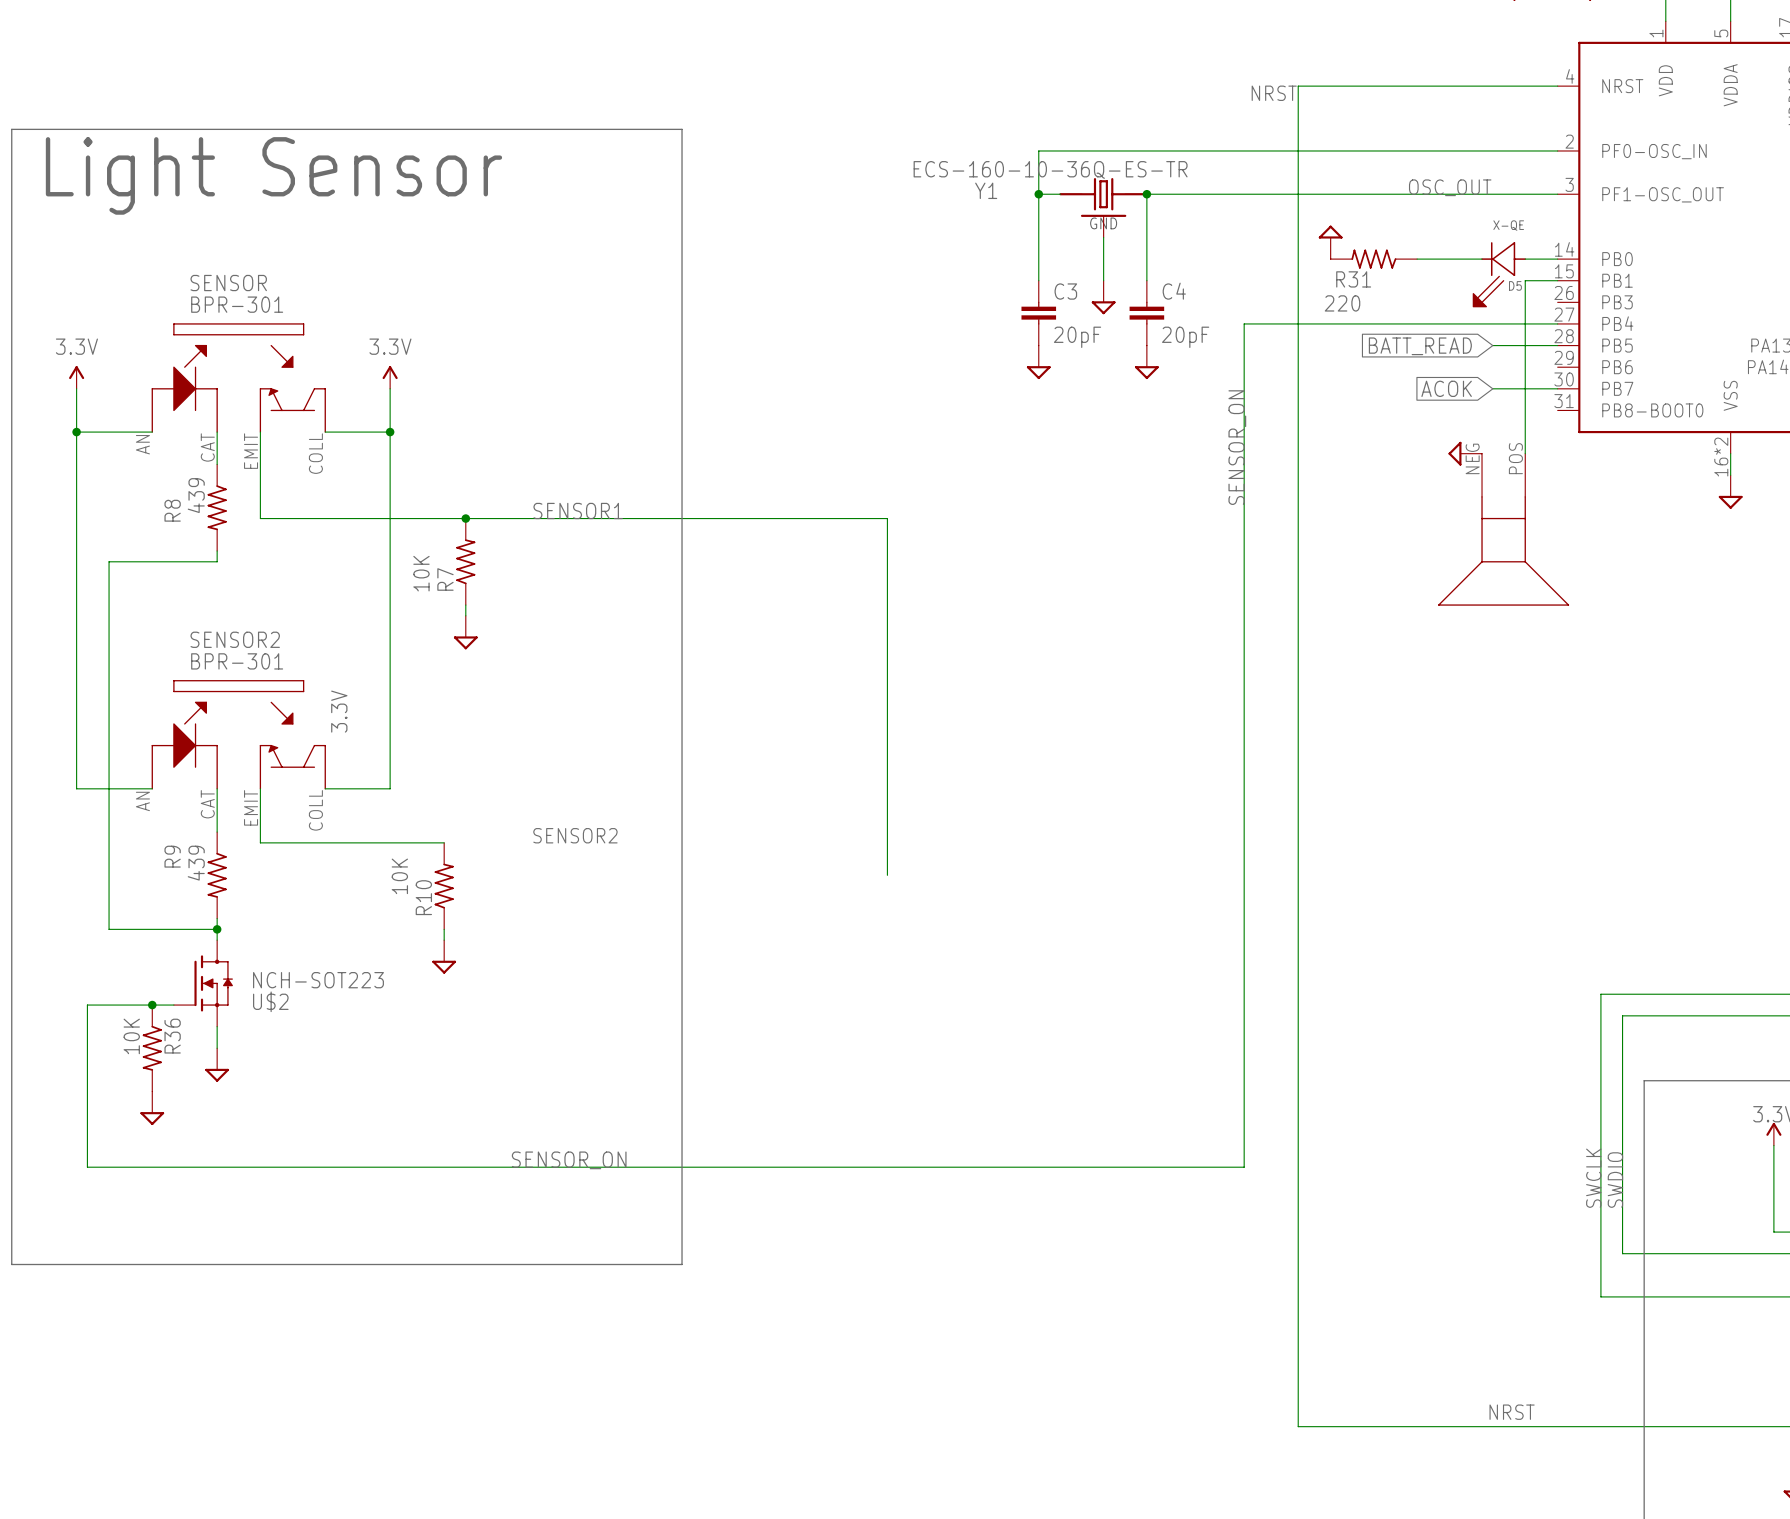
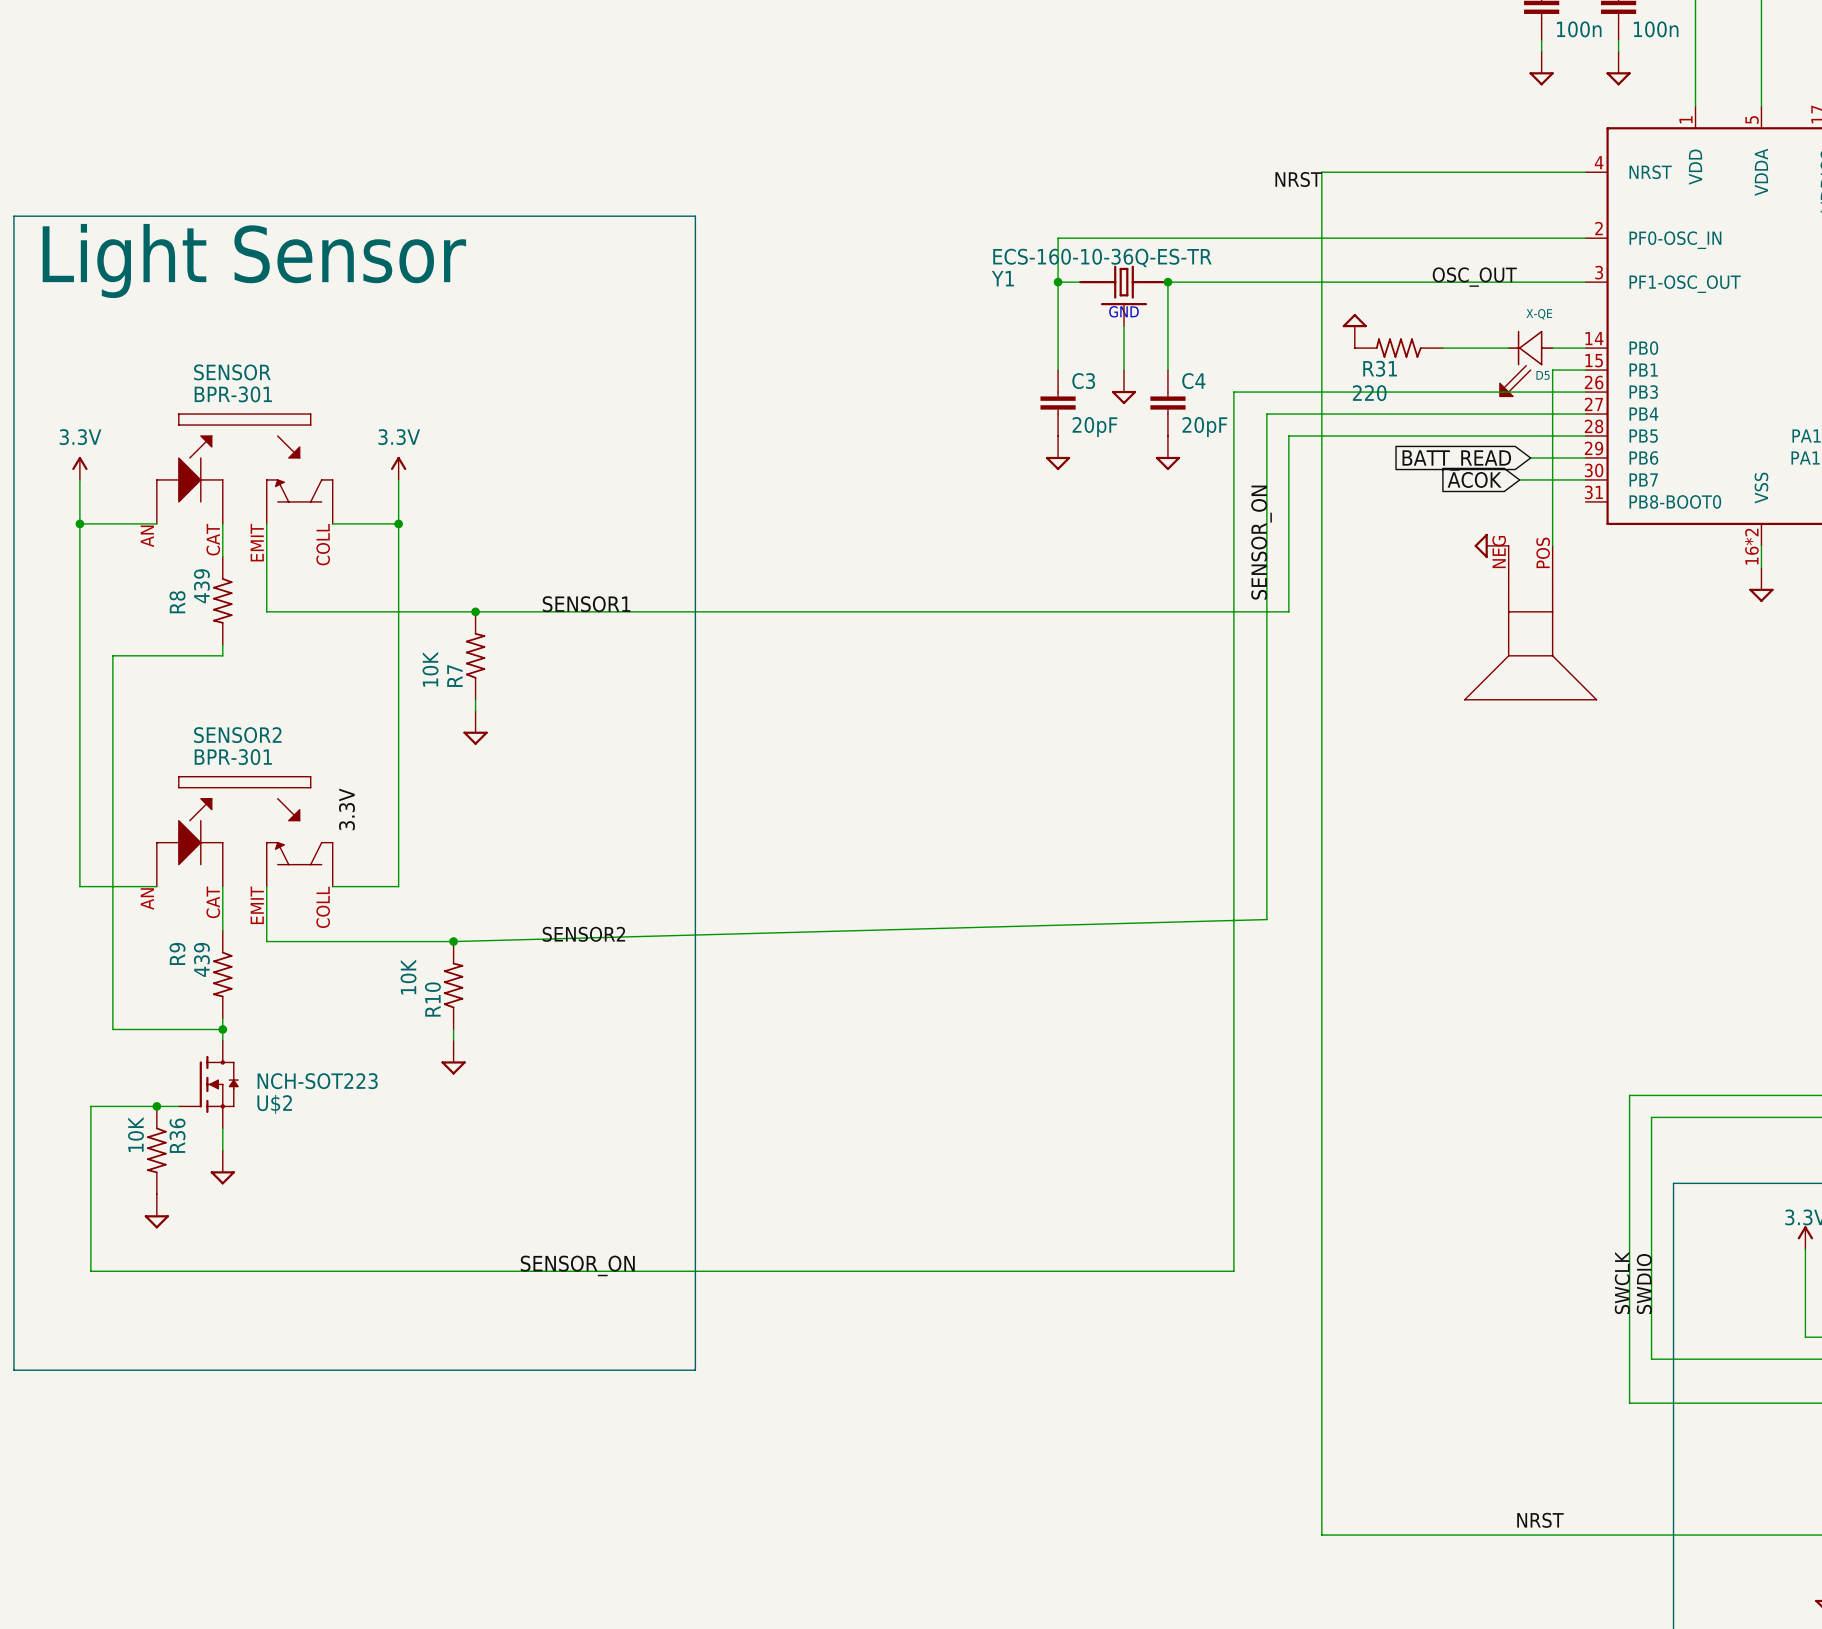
global label position: BATT_READ (1420, 346) -> BATT_READ (1456, 460)
wire: none -> (1530, 457) (1585, 457)
wire: (887, 518) (887, 875) -> (904, 611) (1288, 611) (1288, 436) (1519, 436)
wire: (1244, 821) (1244, 1167) (1211, 1167) -> (1585, 392) (1233, 392) (1233, 1271)
wire: none -> (1266, 919) (453, 941)
junction: none -> (453, 941)

